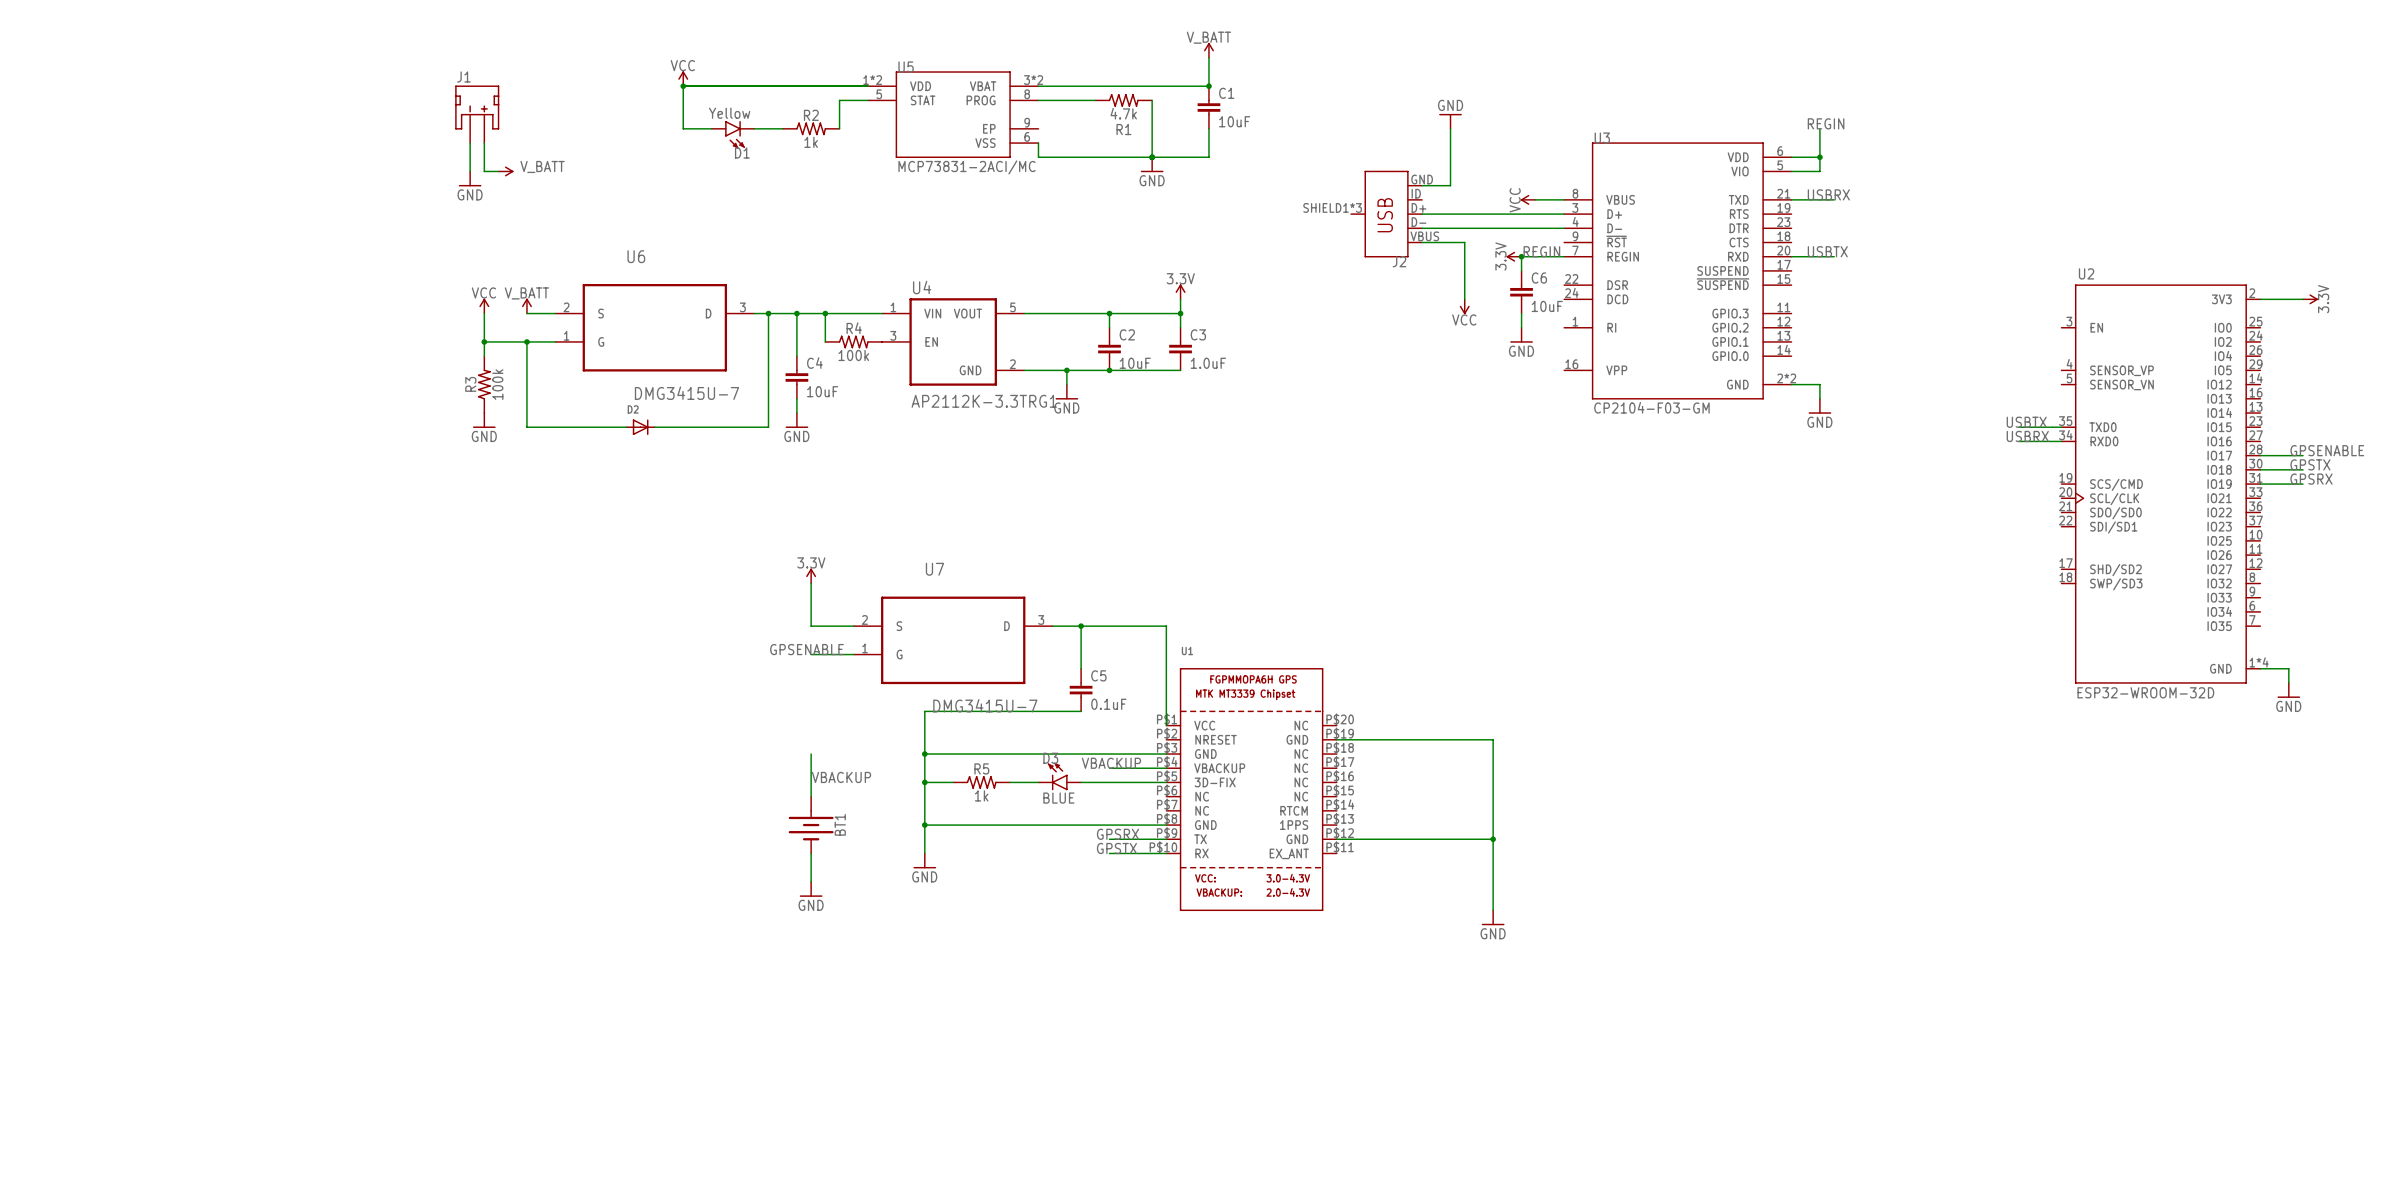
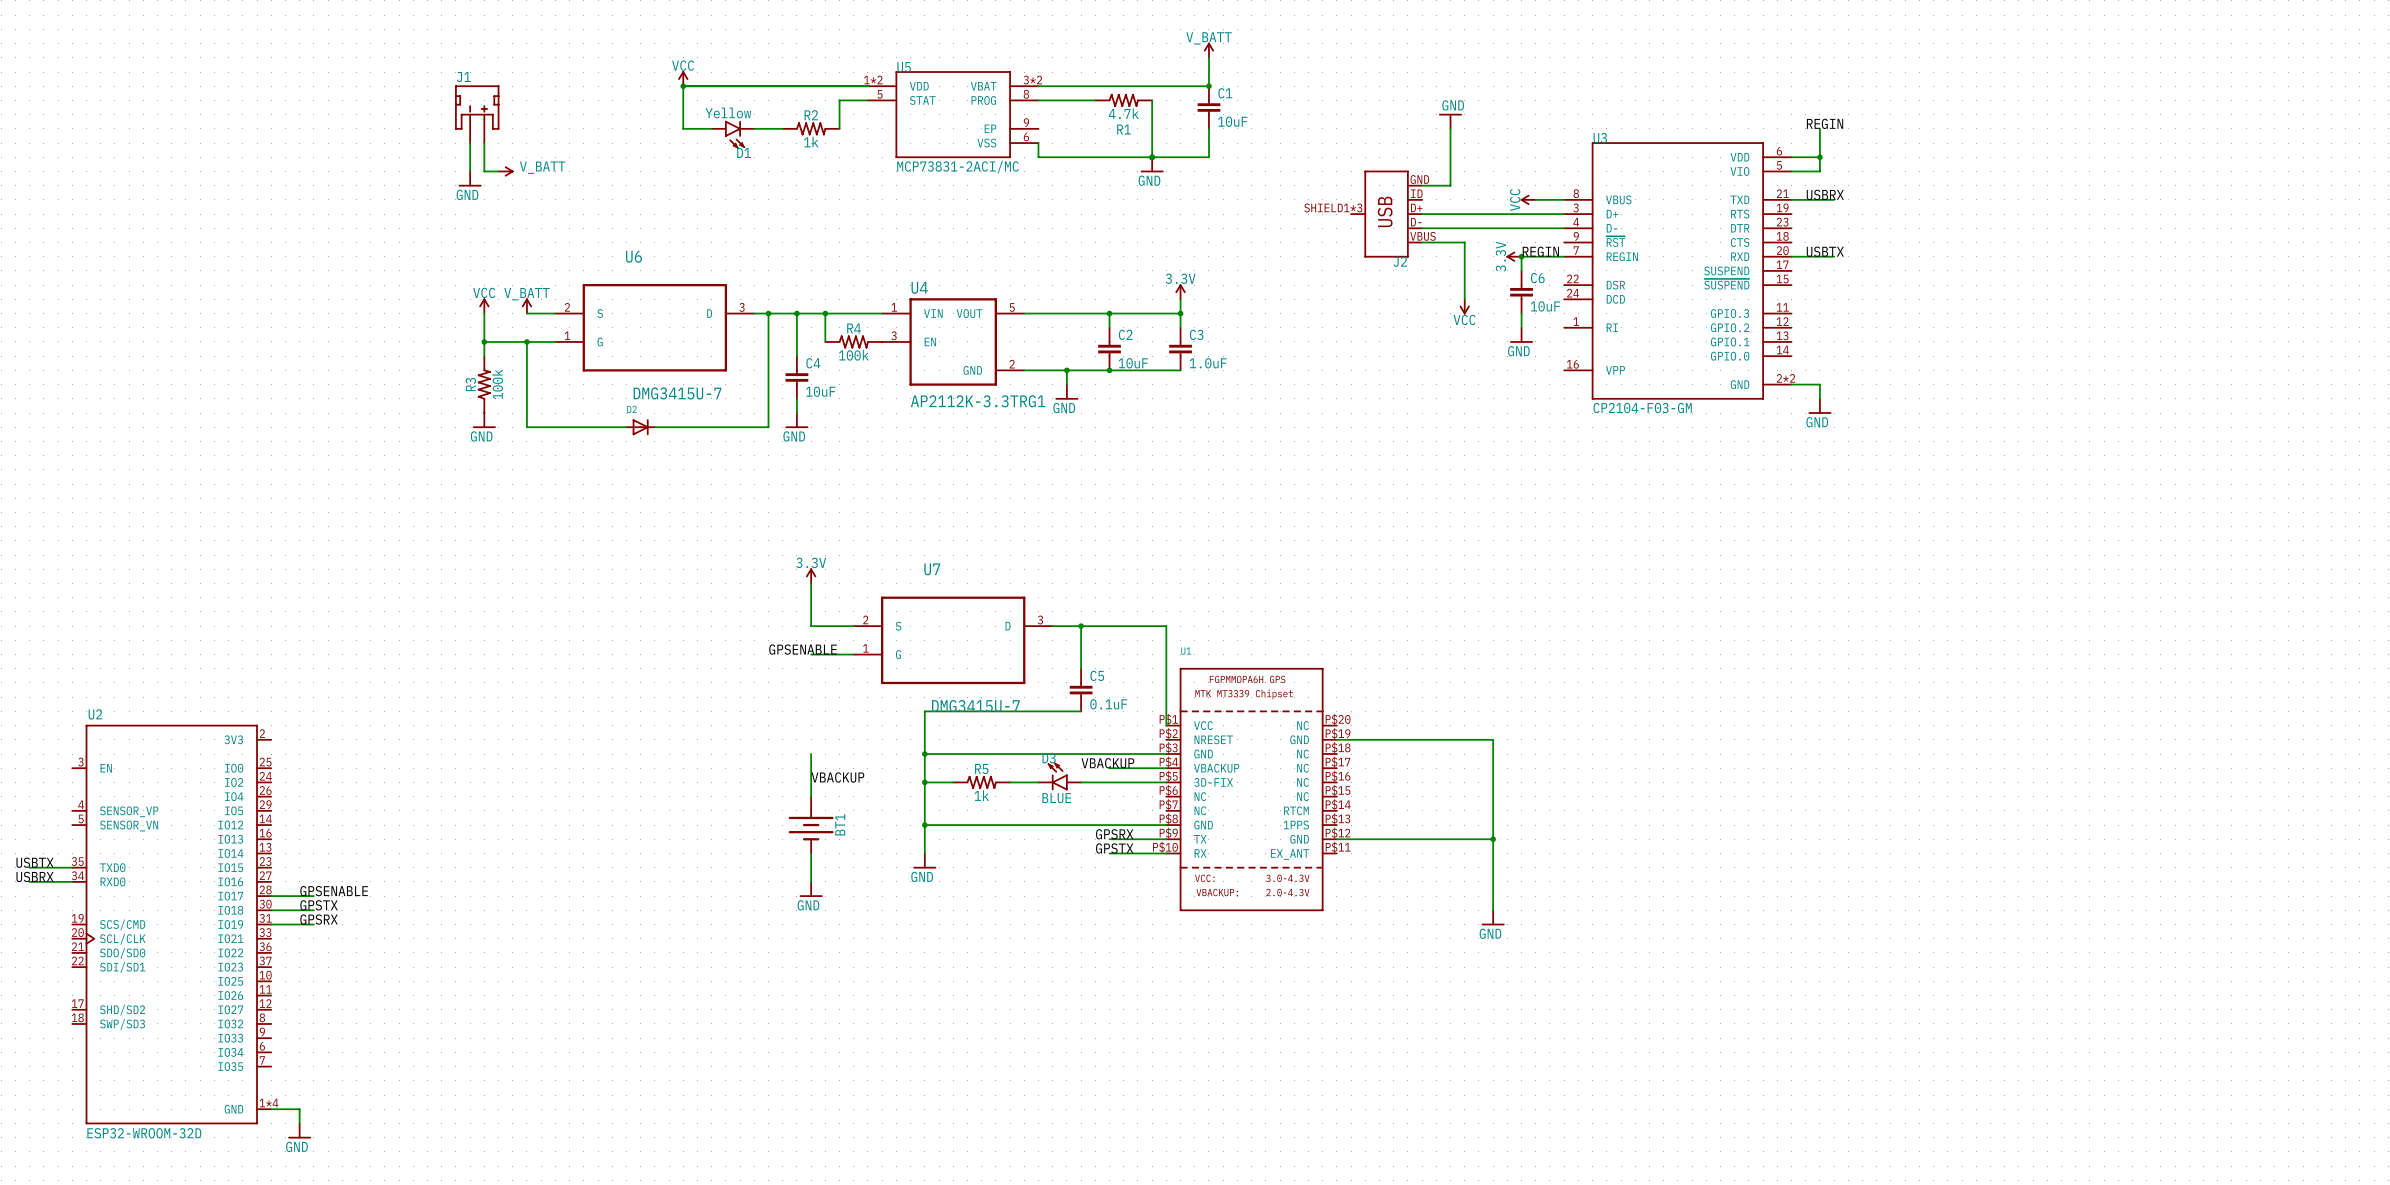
wire: (2260, 299) (2303, 299) -> none
power symbol: 3.3V (2310, 299) -> none
label: USBTX (2026, 422) -> none
wire: (2018, 427) (2061, 427) -> none
label: USBRX (2027, 436) -> none
wire: (2018, 441) (2061, 441) -> none
label: GPSENABLE (2327, 450) -> none
wire: (2260, 455) (2303, 455) -> none
label: GPSTX (2310, 464) -> none
wire: (2260, 469) (2303, 469) -> none
label: GPSRX (2311, 479) -> none
U2 position: (2160, 484) -> (171, 924)
wire: (2260, 484) (2303, 484) -> none
wire: (2260, 668) (2288, 668) (2288, 682) -> none
power symbol: GND (2288, 690) -> none
label: none -> USBTX (35, 862)
wire: none -> (29, 867) (72, 867)
label: none -> USBRX (35, 876)
wire: none -> (29, 881) (72, 881)
label: none -> GPSENABLE (334, 891)
wire: none -> (271, 896) (313, 896)
label: none -> GPSTX (319, 905)
wire: none -> (271, 910) (313, 910)
label: none -> GPSRX (319, 919)
wire: none -> (271, 924) (313, 924)
wire: none -> (271, 1109) (299, 1109) (299, 1123)
power symbol: none -> GND (299, 1130)

